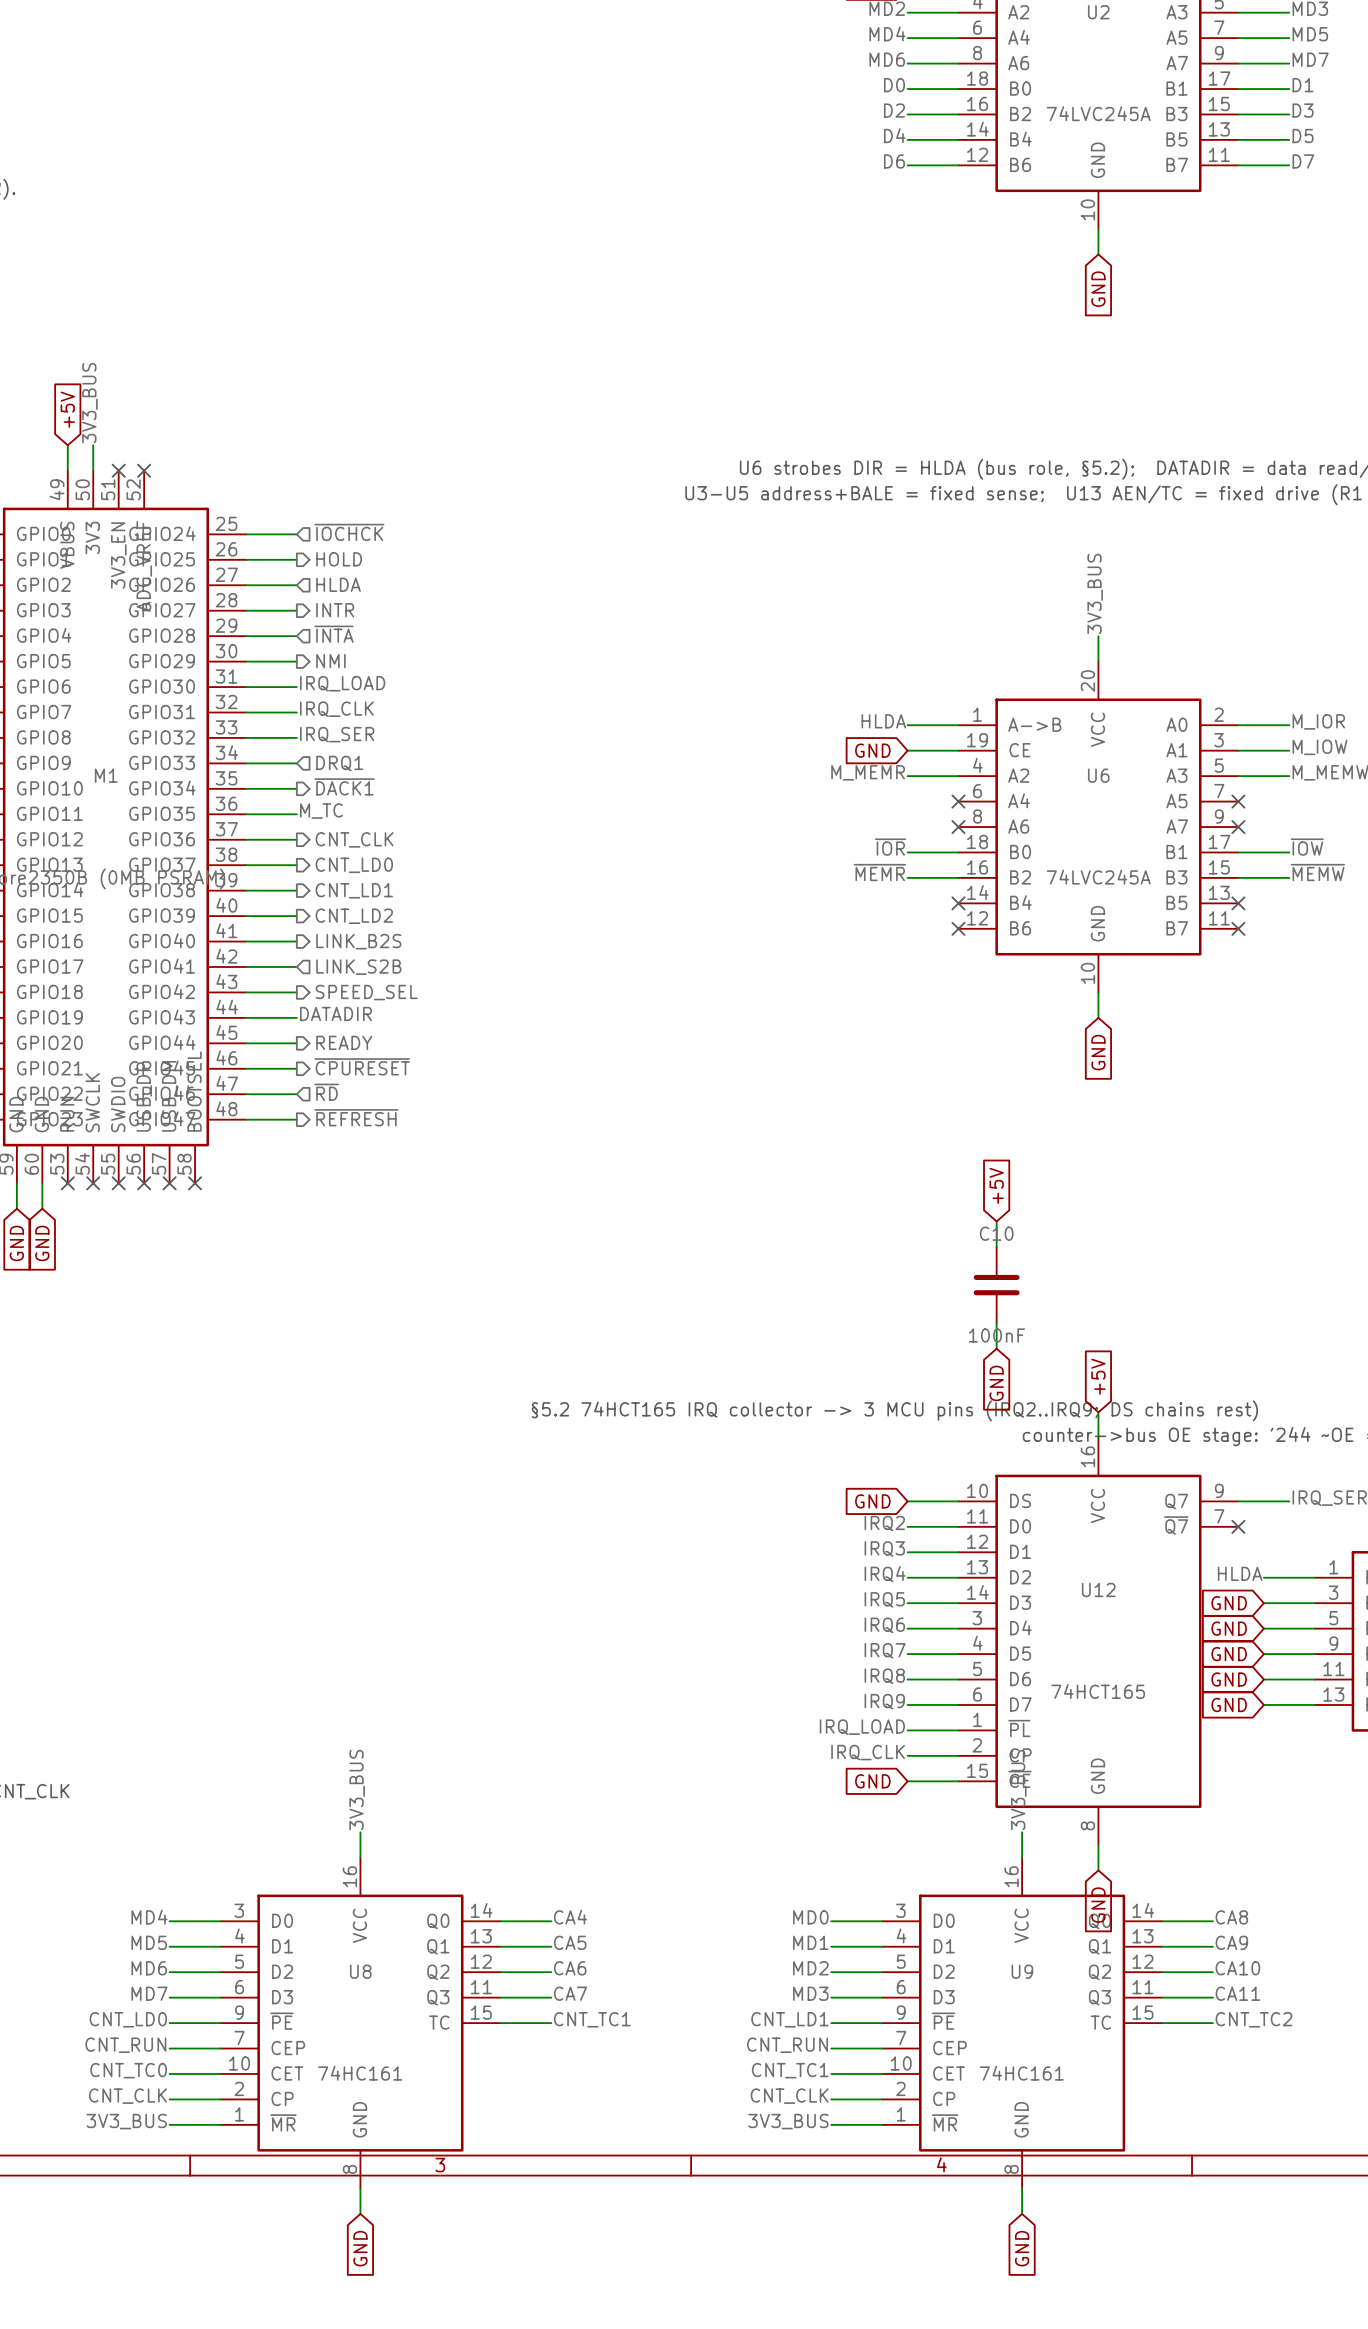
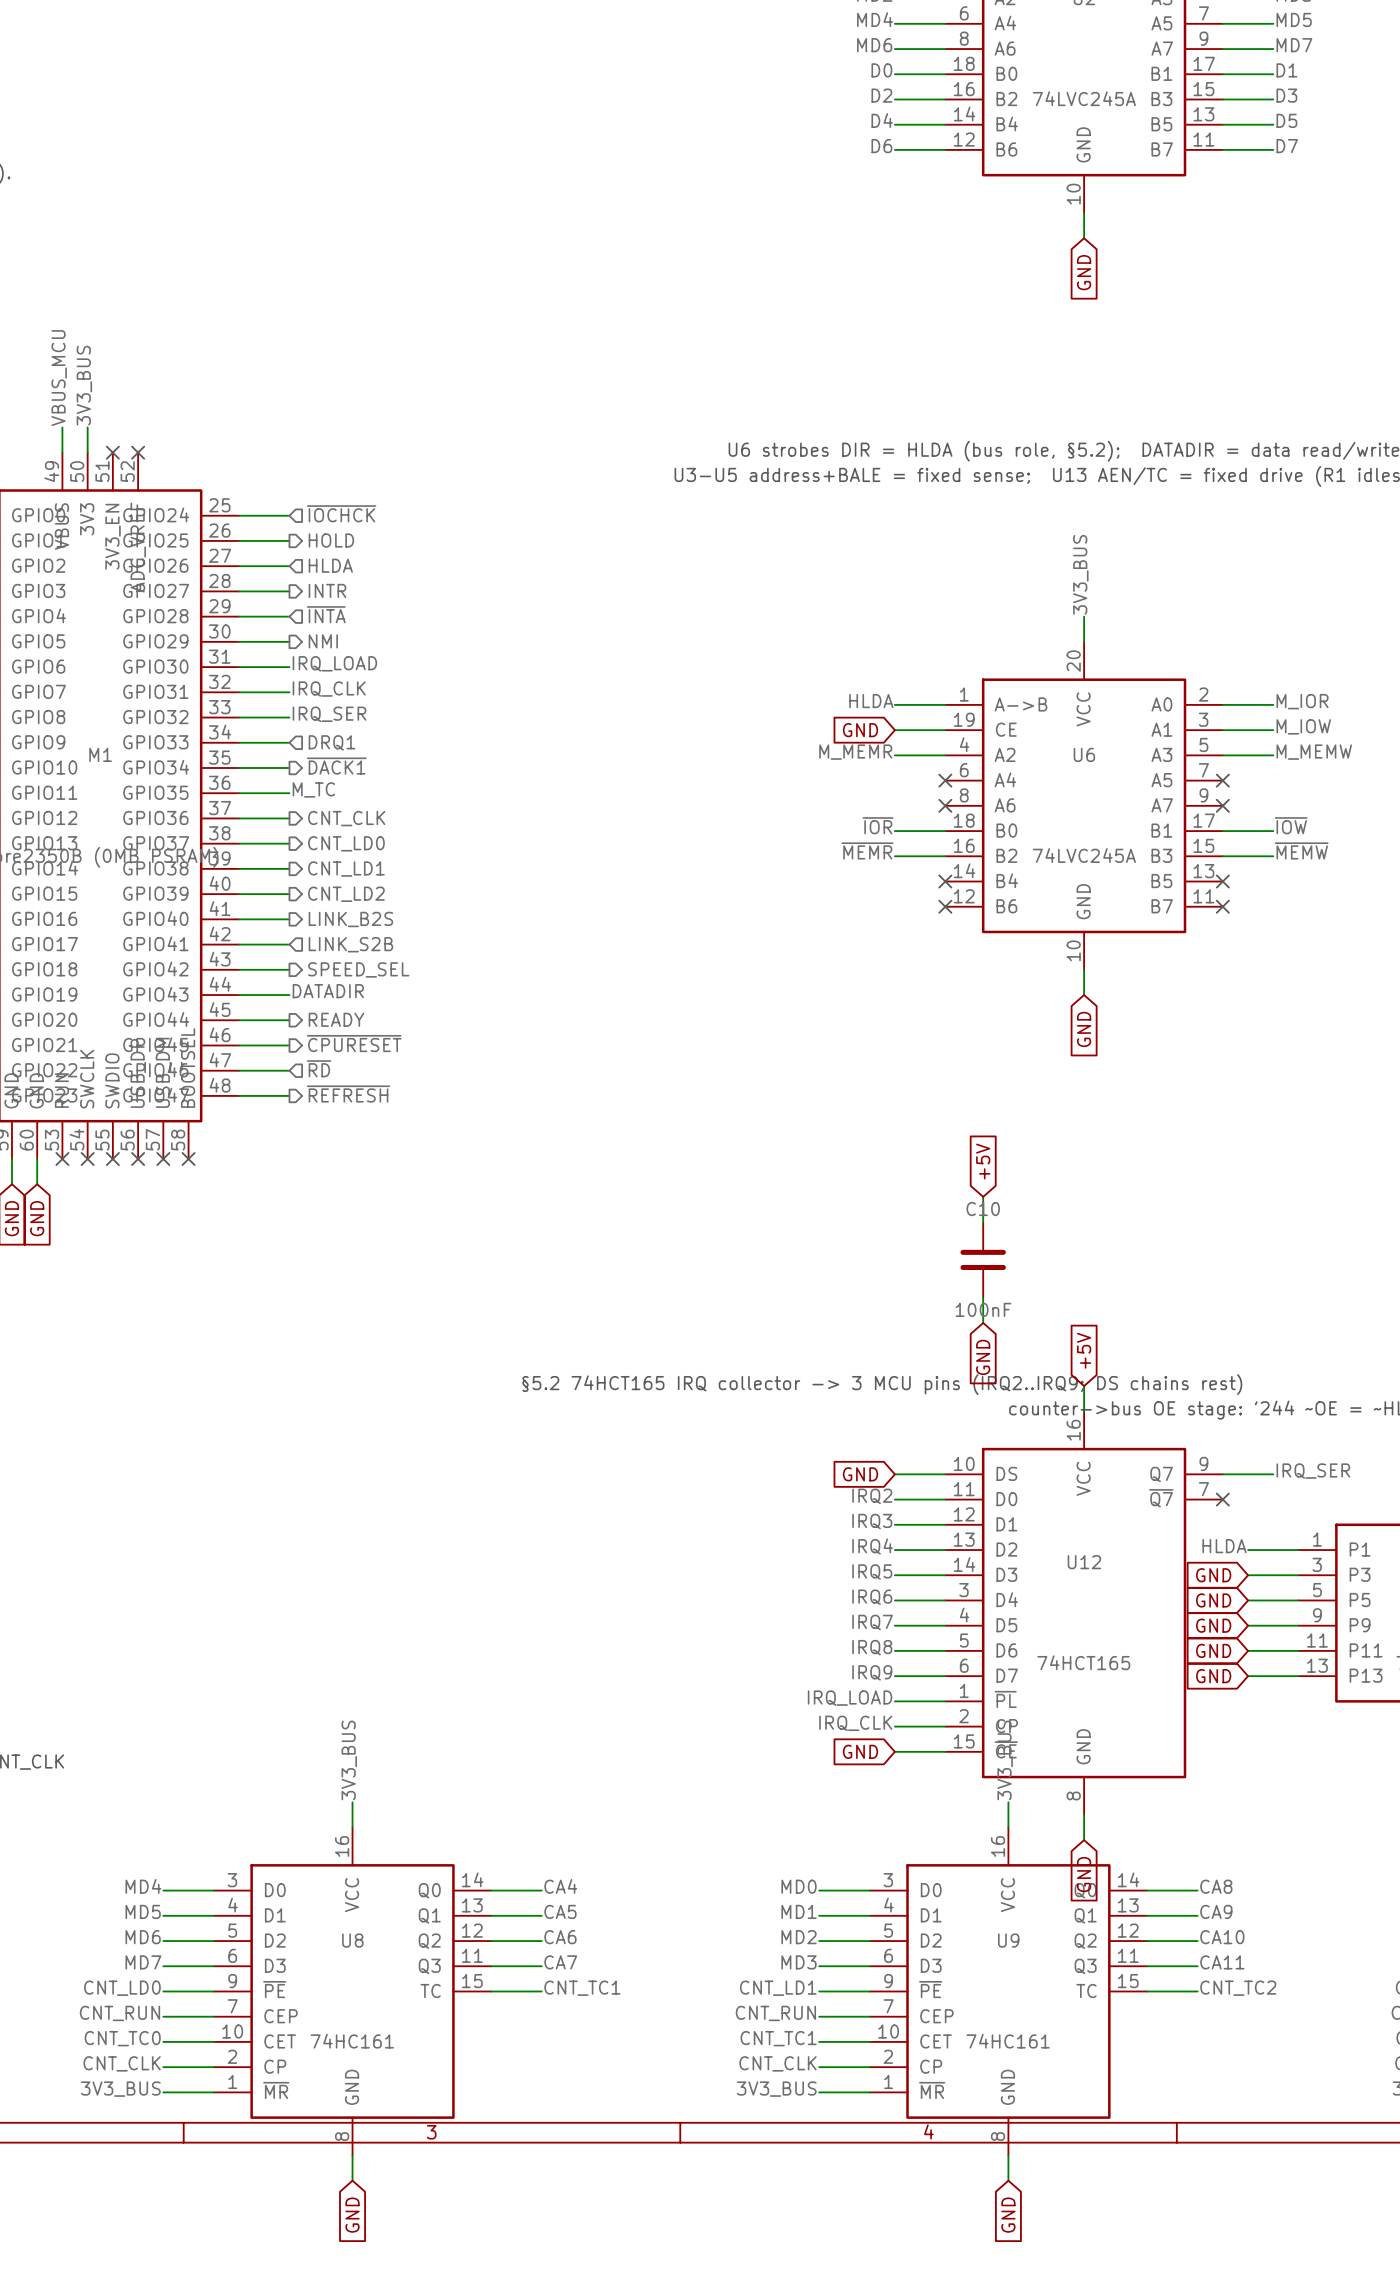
label: none -> VBUS_MCU (59, 378)
global label: +5V (67, 409) -> none

